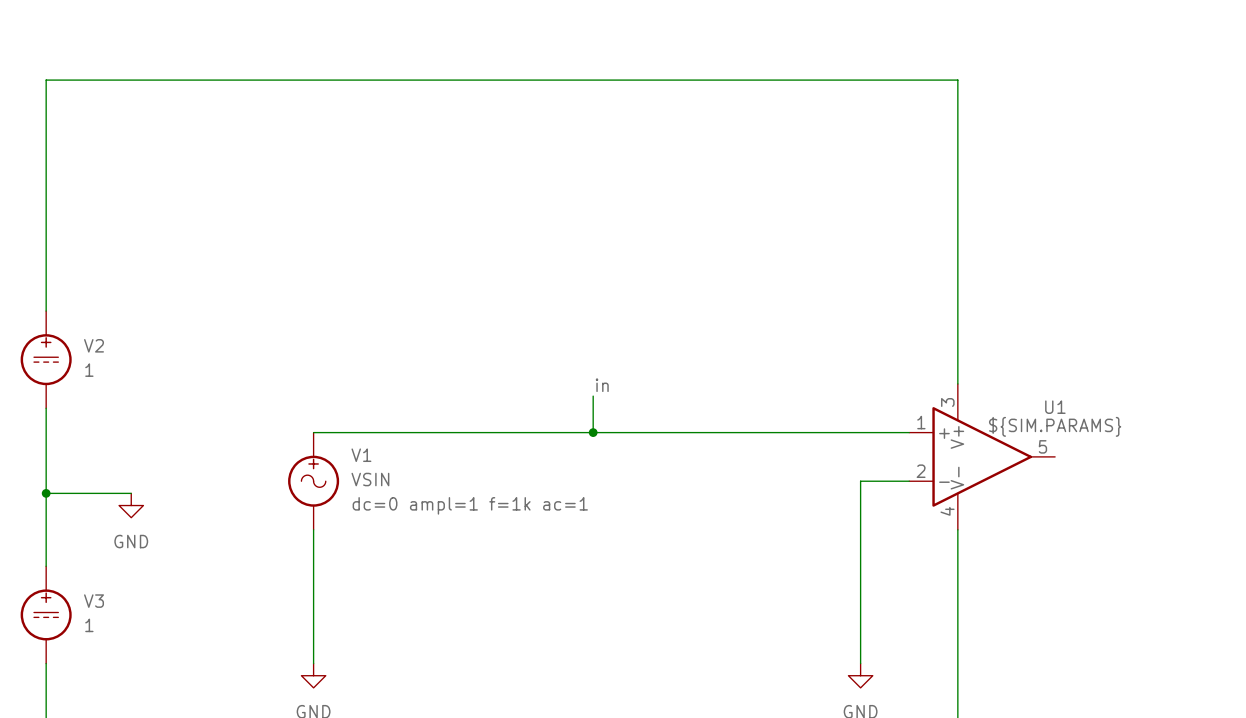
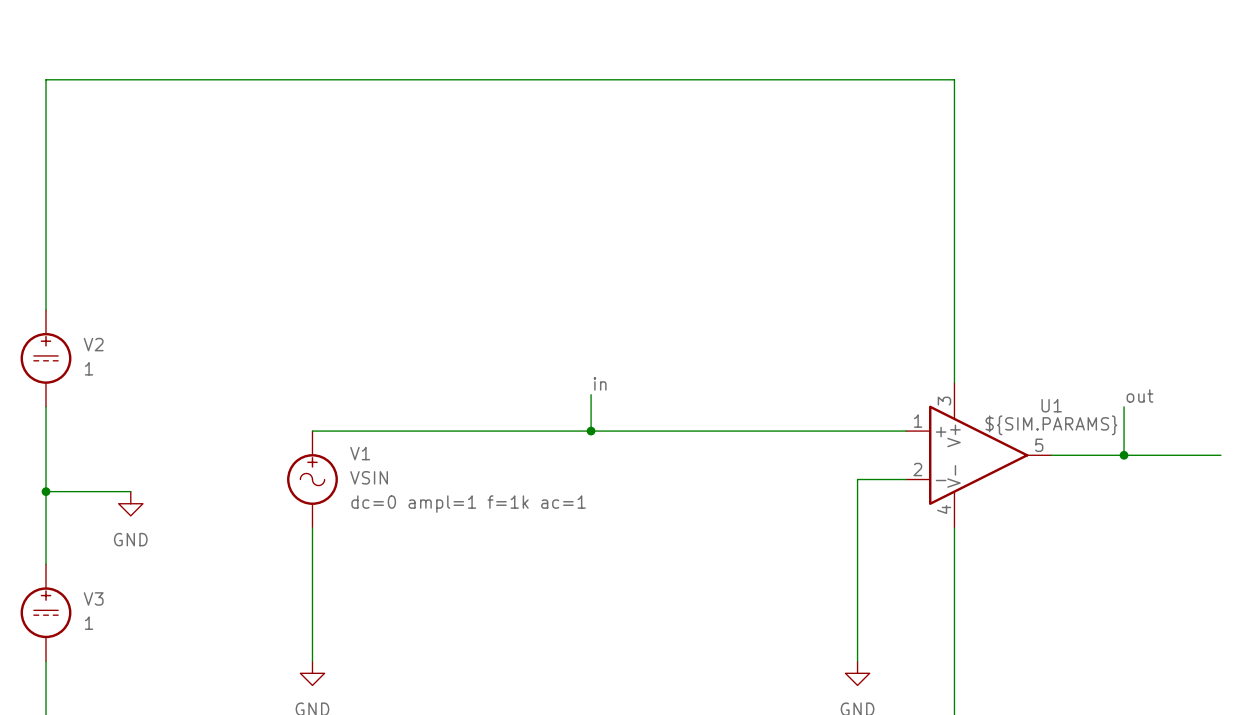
label: none -> out (1139, 396)
wire: none -> (1124, 406) (1124, 455)
wire: none -> (1051, 455) (1220, 455)
junction: none -> (1124, 455)

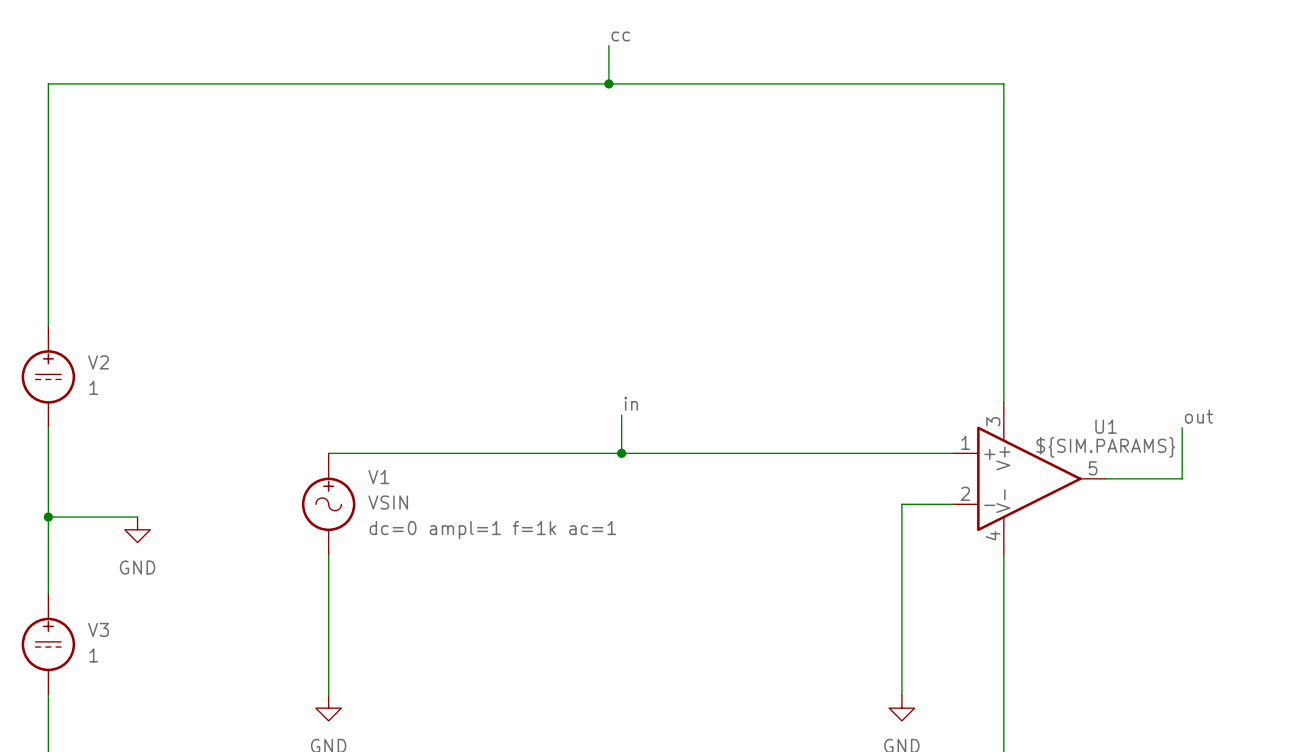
label: none -> cc (620, 36)
wire: none -> (608, 45) (608, 83)
junction: none -> (608, 83)
wire: (1124, 455) (1220, 455) -> none
junction: (1124, 455) -> none

